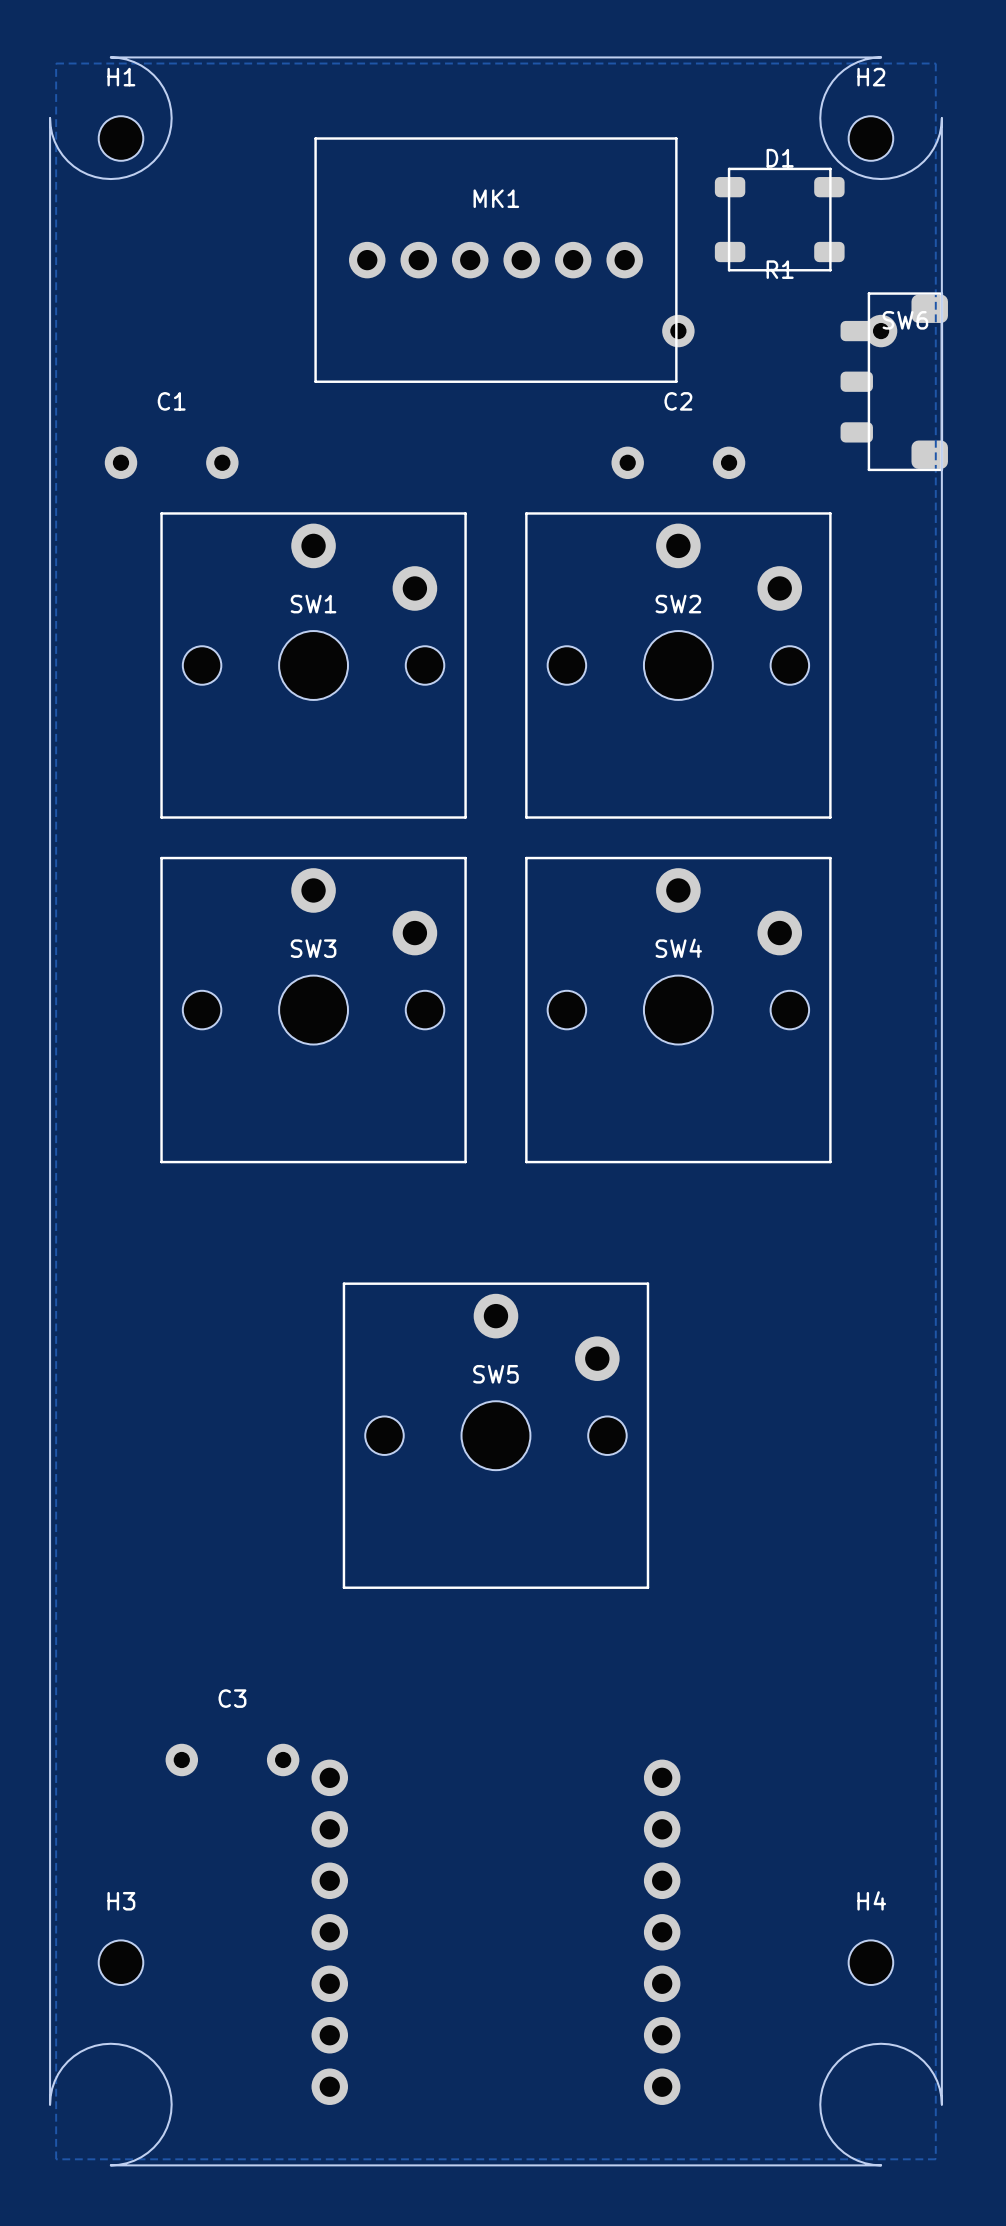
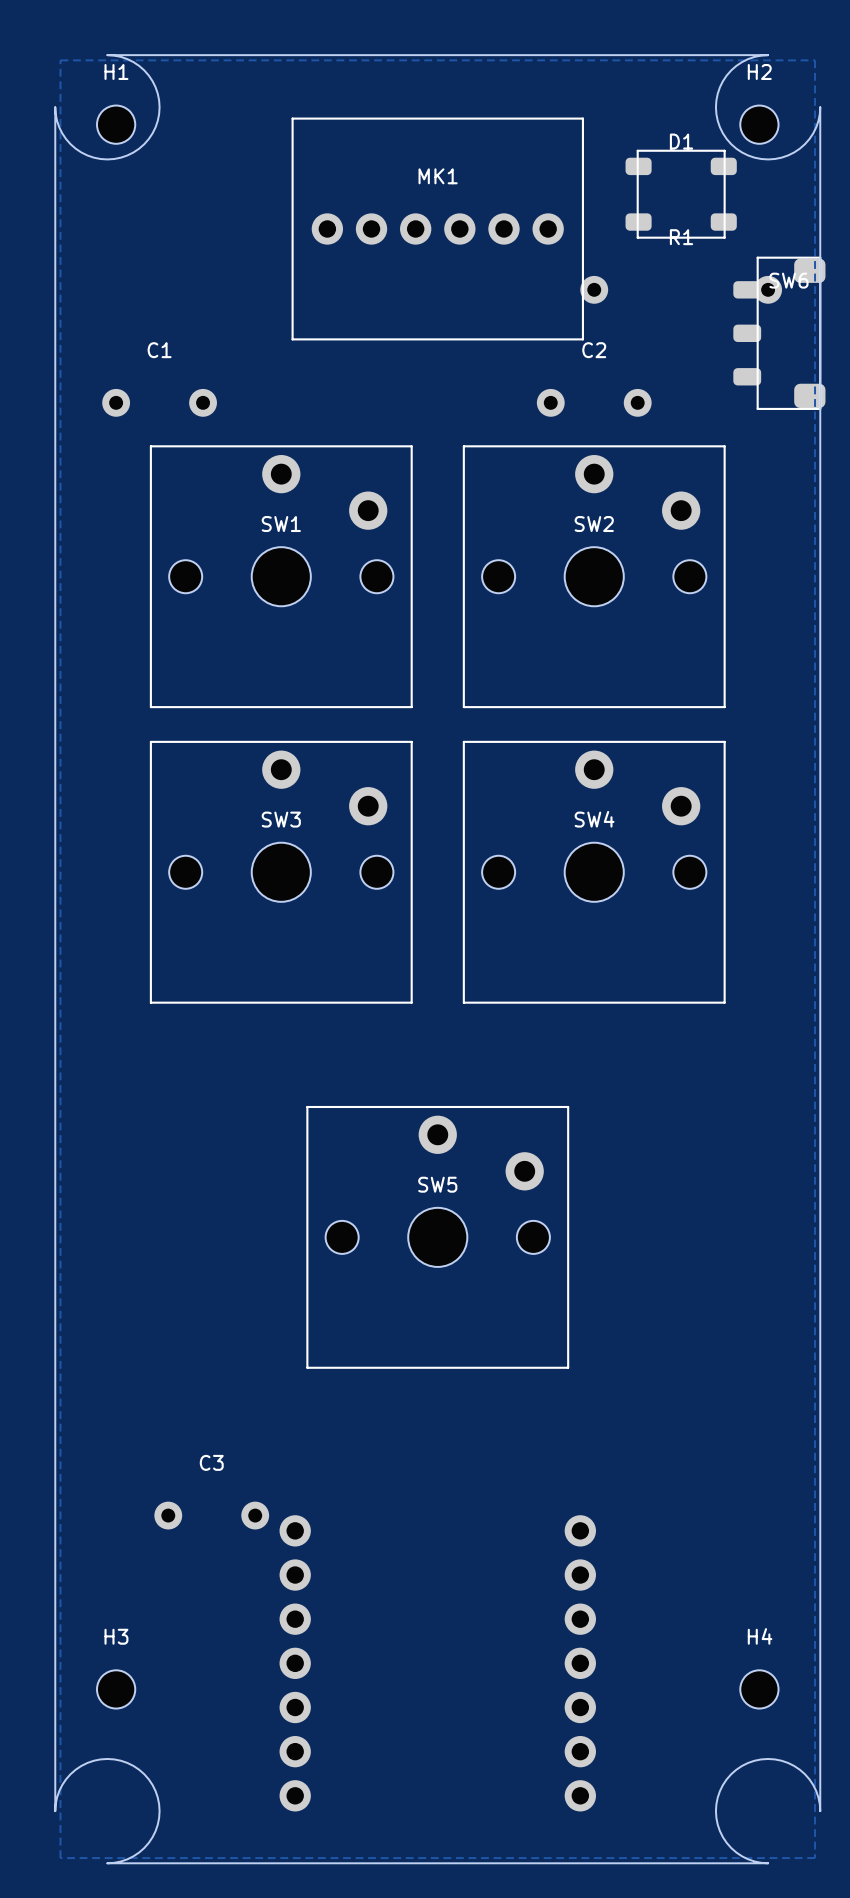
MK1 footprint: [314, 137, 678, 383] -> [291, 117, 584, 341]

